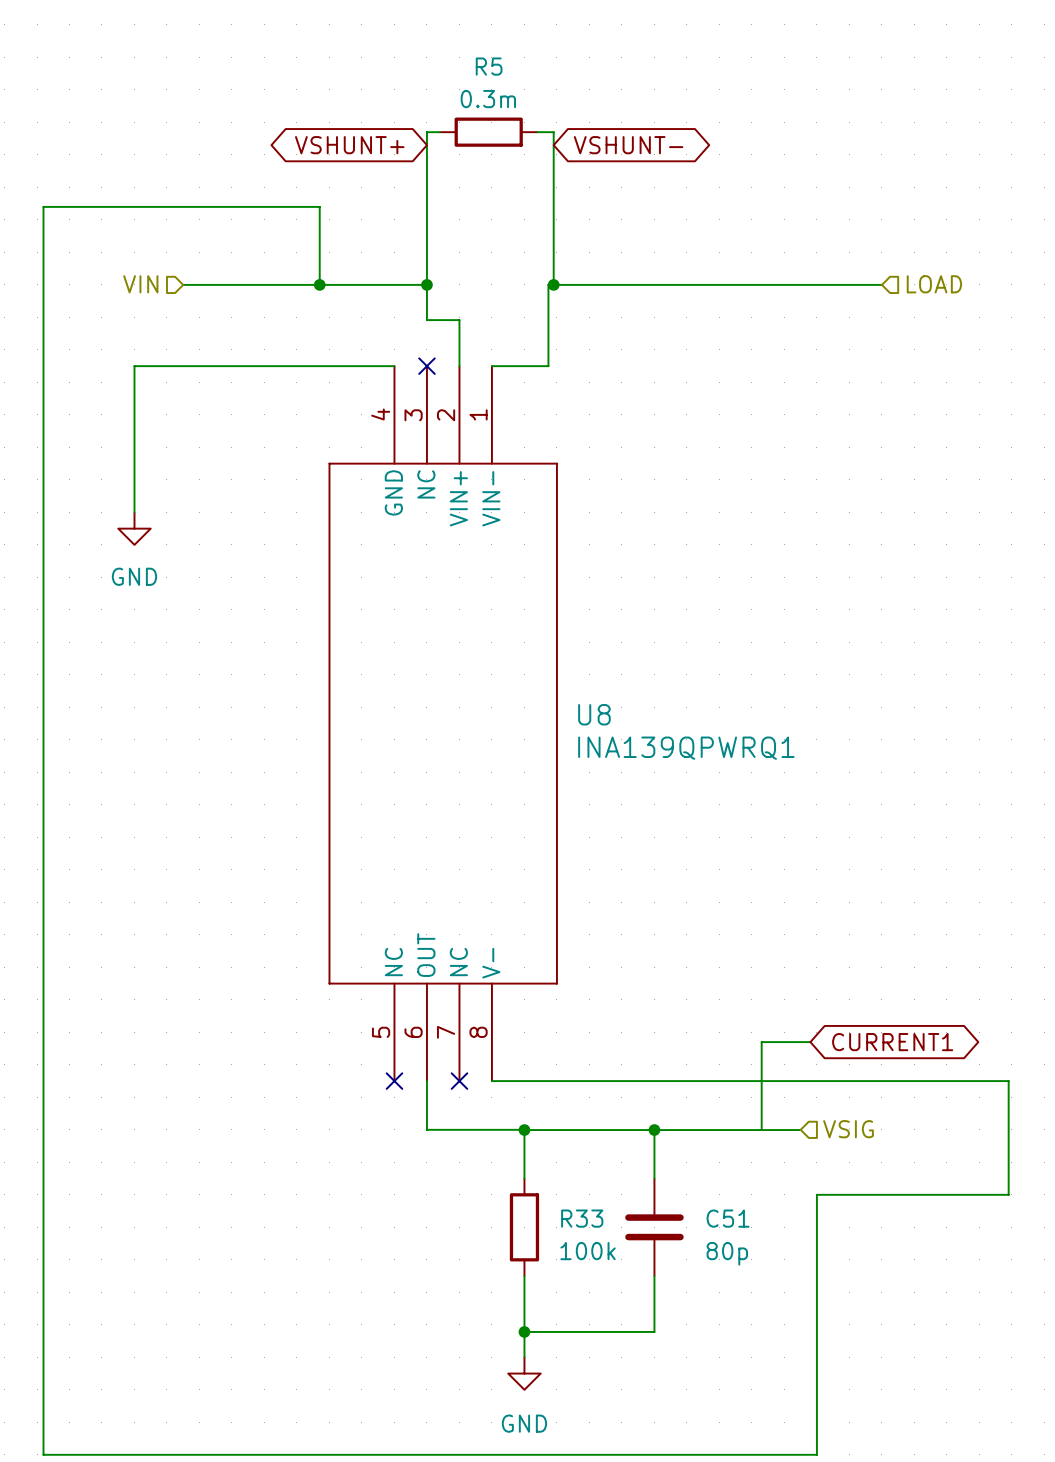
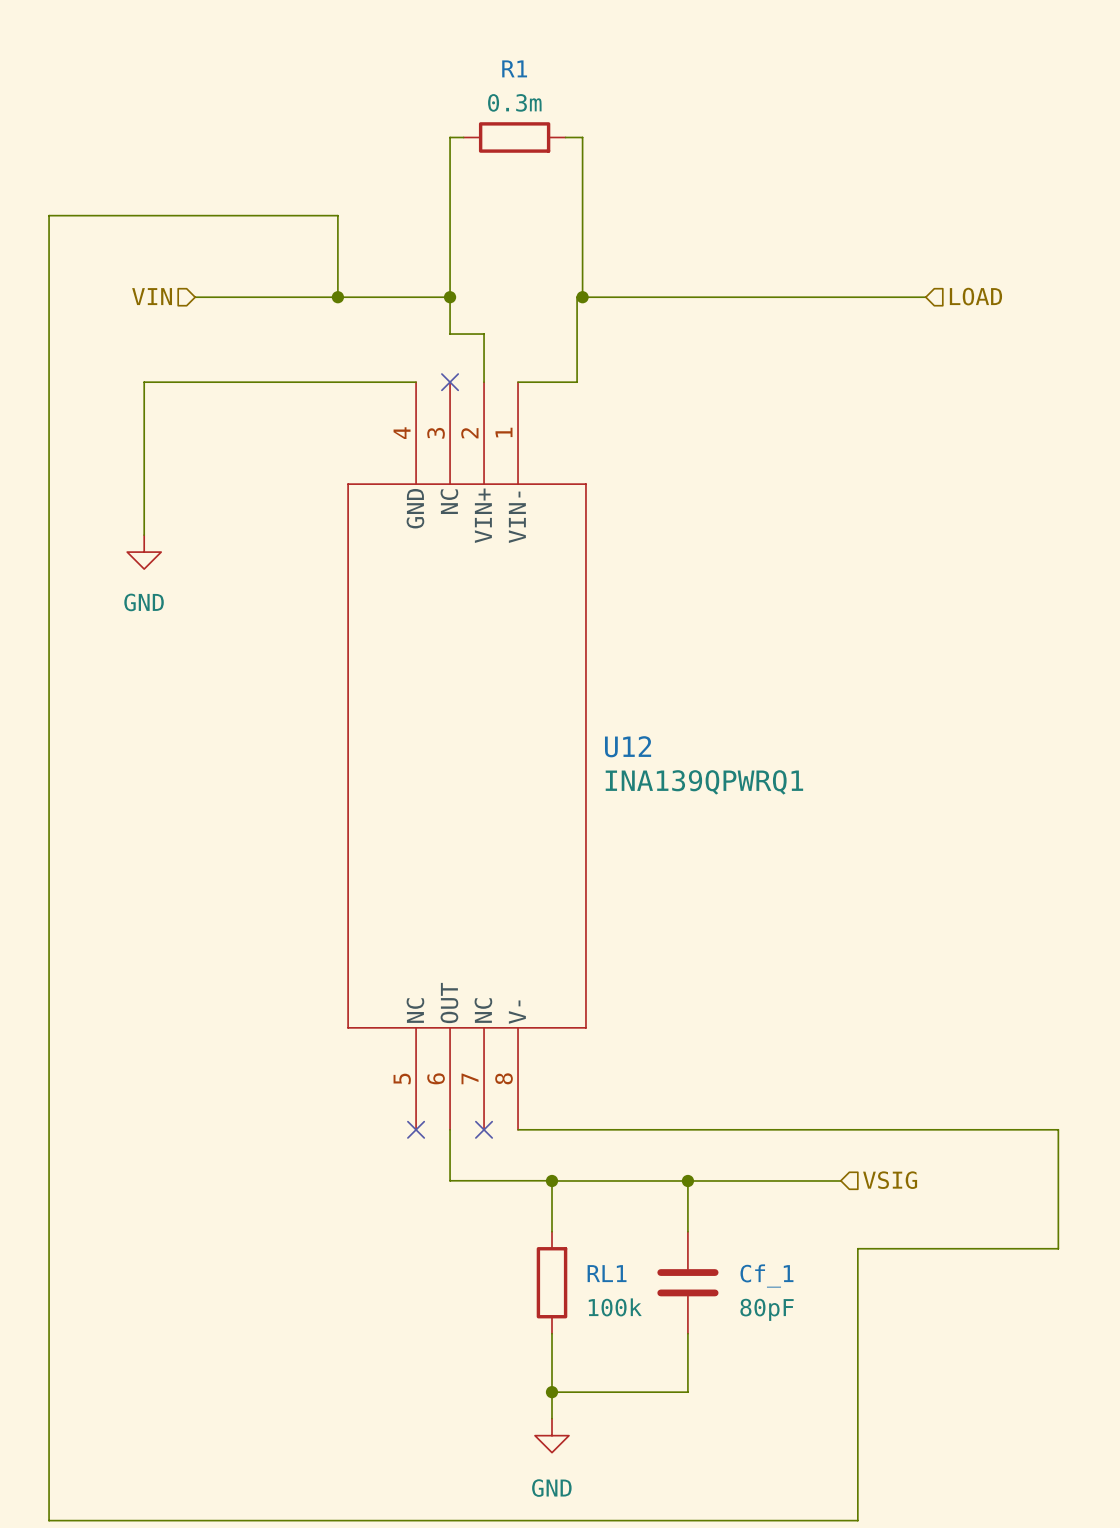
R5 name: R5 (489, 66) -> R1 (514, 68)
global label: VSHUNT+ (349, 145) -> none
global label: VSHUNT- (628, 145) -> none
U8 name: U8 (594, 714) -> U12 (628, 746)
wire: (810, 1042) (761, 1042) (761, 1129) -> none
global label: CURRENT1 (892, 1042) -> none
R33 name: R33 (582, 1218) -> RL1 (607, 1273)
C51 name: C51 (728, 1218) -> Cf_1 (766, 1275)
C51 value: 80p (727, 1253) -> 80pF (767, 1309)

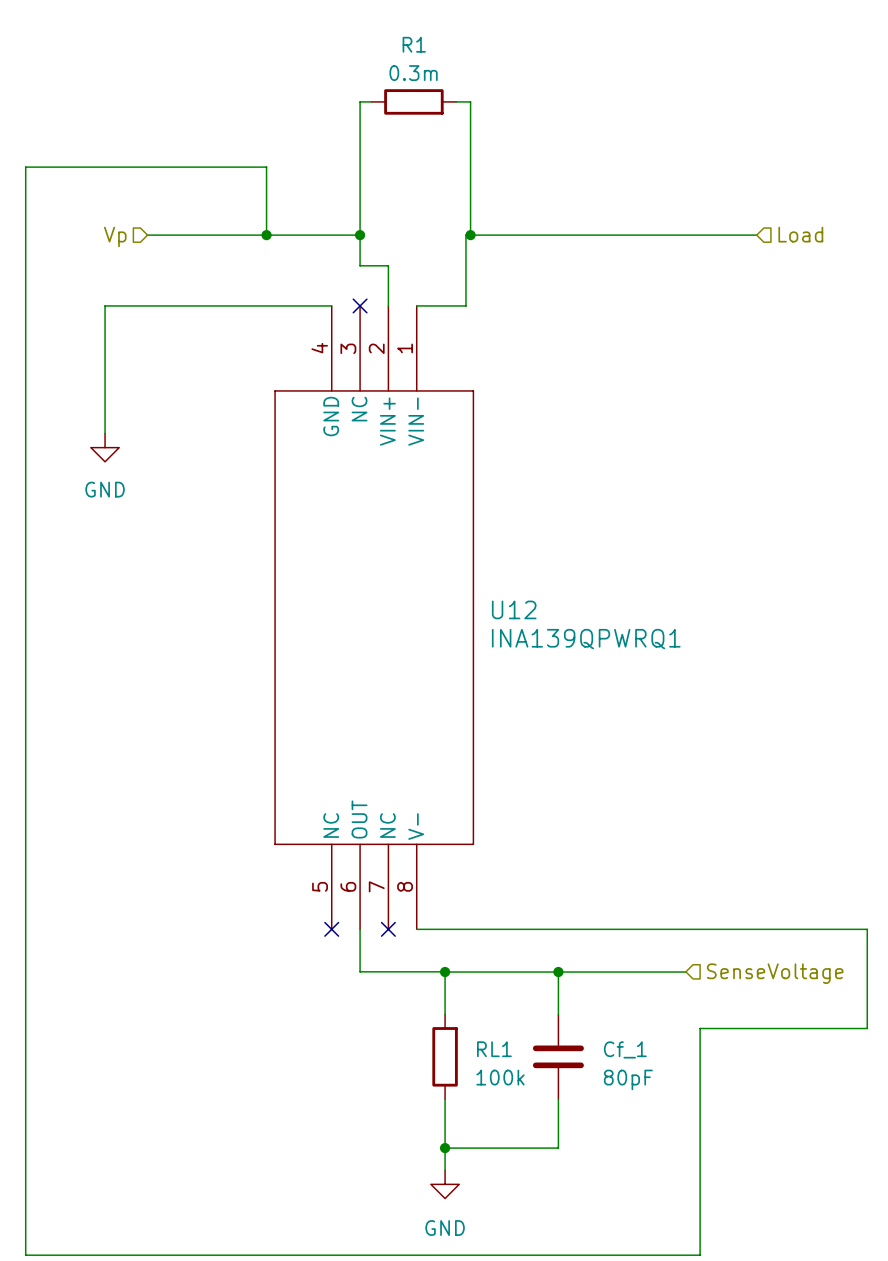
hierarchical label: VIN (152, 296) -> Vp (115, 236)
hierarchical label: LOAD (975, 296) -> Load (800, 234)
hierarchical label: VSIG (890, 1180) -> SenseVoltage (775, 973)

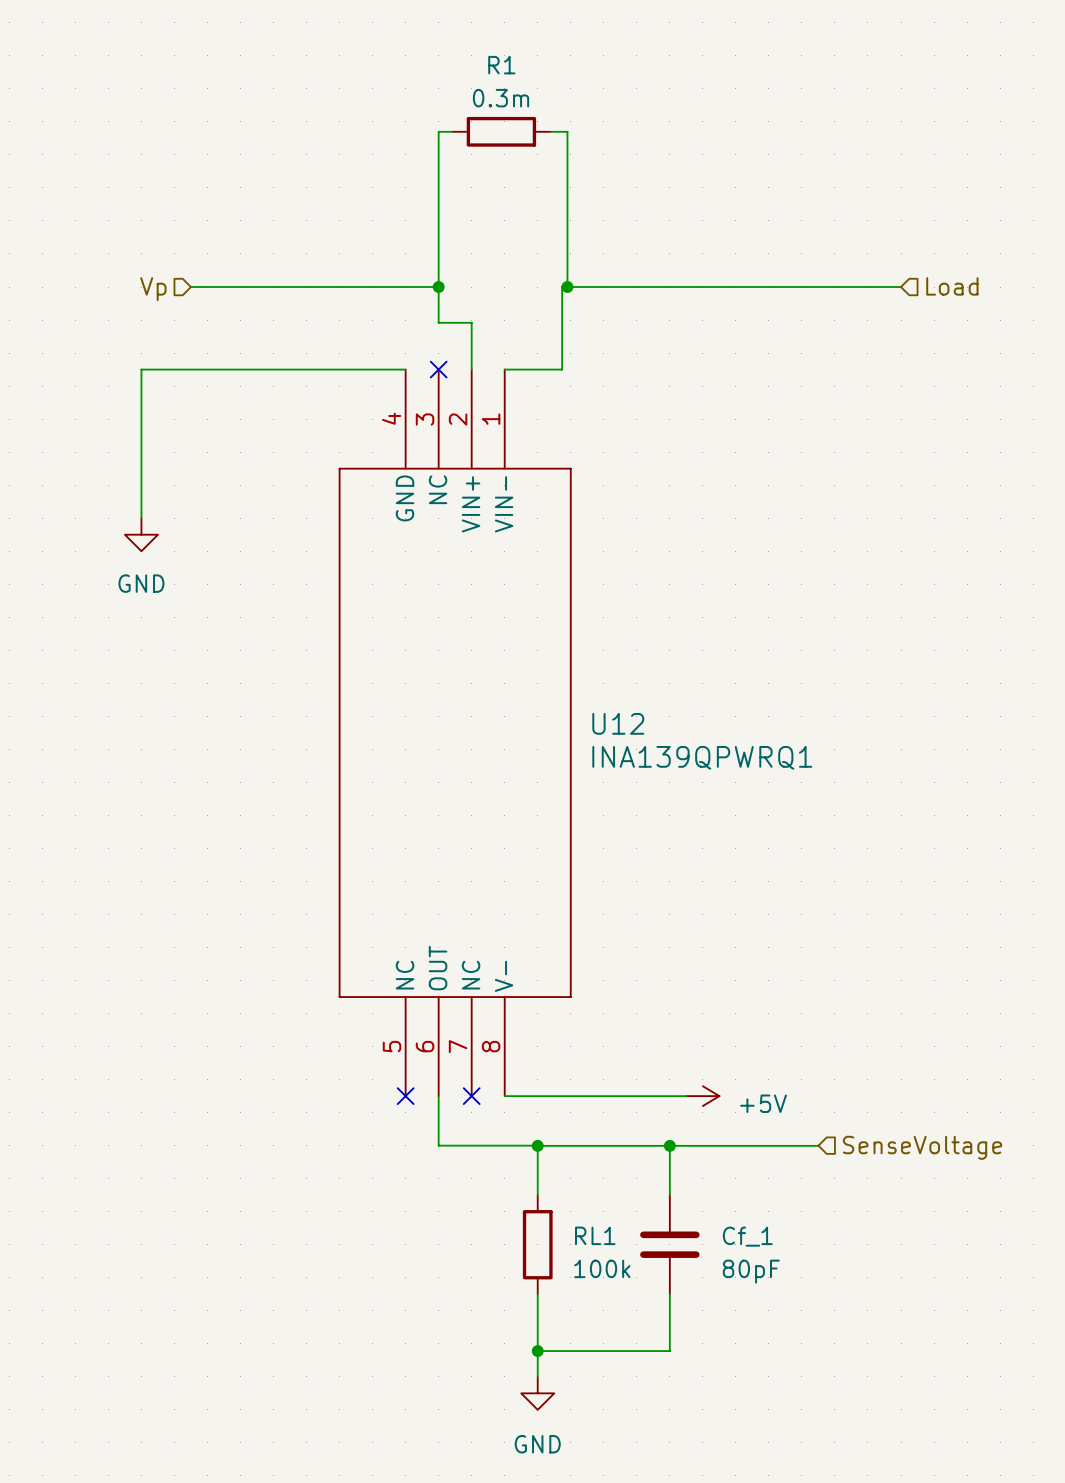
wire: (266, 235) (266, 167) (25, 167) (25, 1255) (700, 1255) (700, 1028) (867, 1028) (867, 929) (572, 929) -> none
junction: (266, 235) -> none
power symbol: none -> +5V (702, 1096)

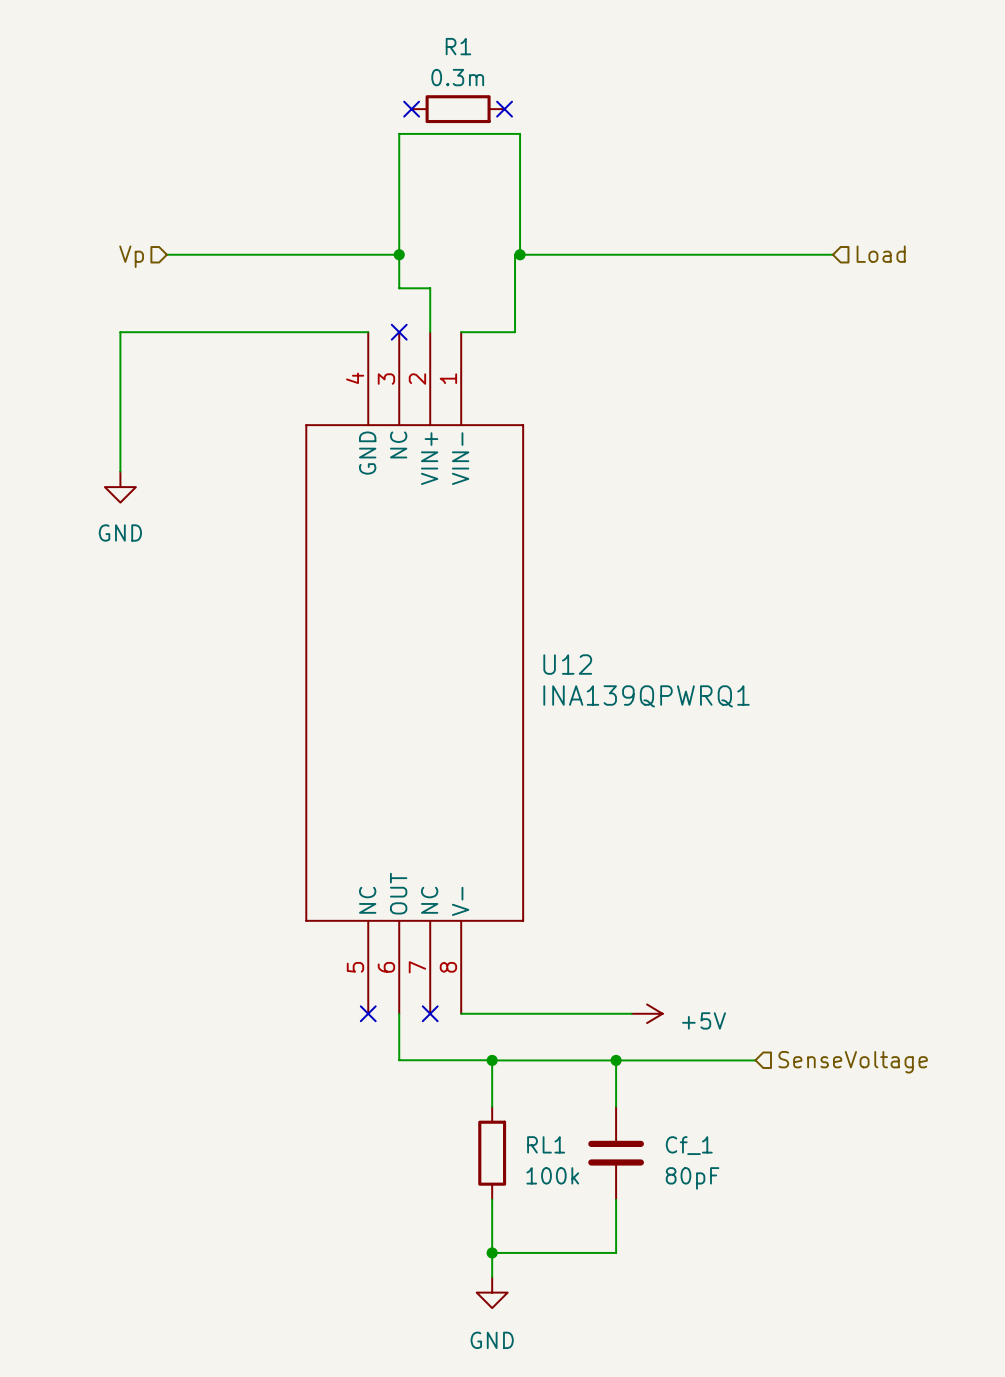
wire: (451, 131) (438, 131) (438, 158) -> none
no-connect mark: none -> (411, 109)
wire: (550, 131) (567, 131) (567, 158) -> (399, 133) (520, 133)
no-connect mark: none -> (504, 109)

